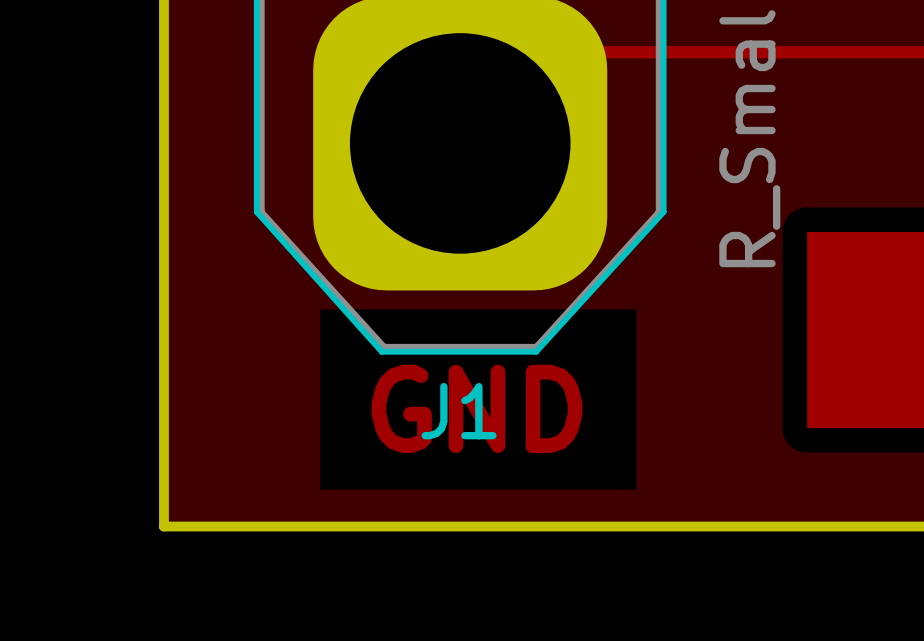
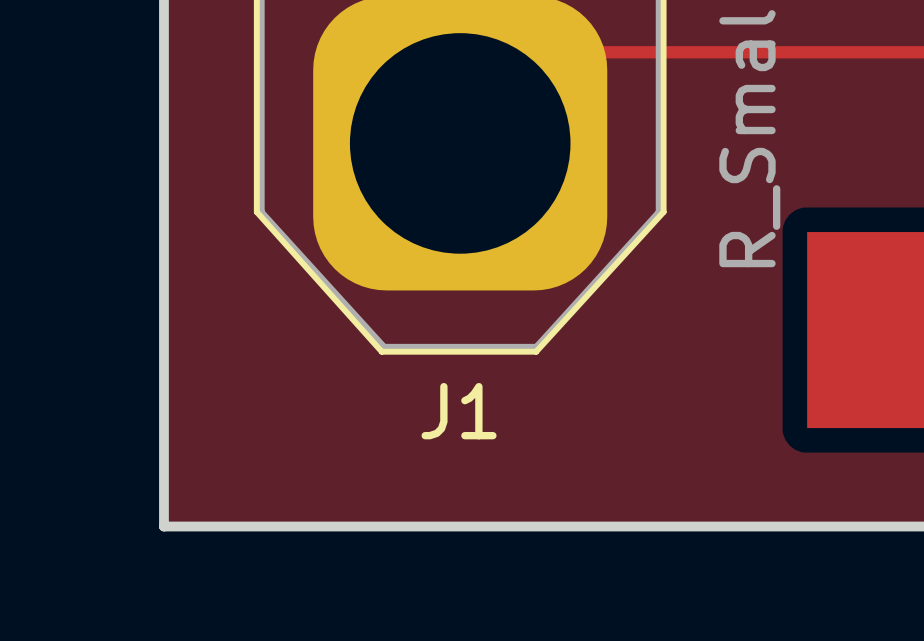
text: GND (476, 408) -> none

